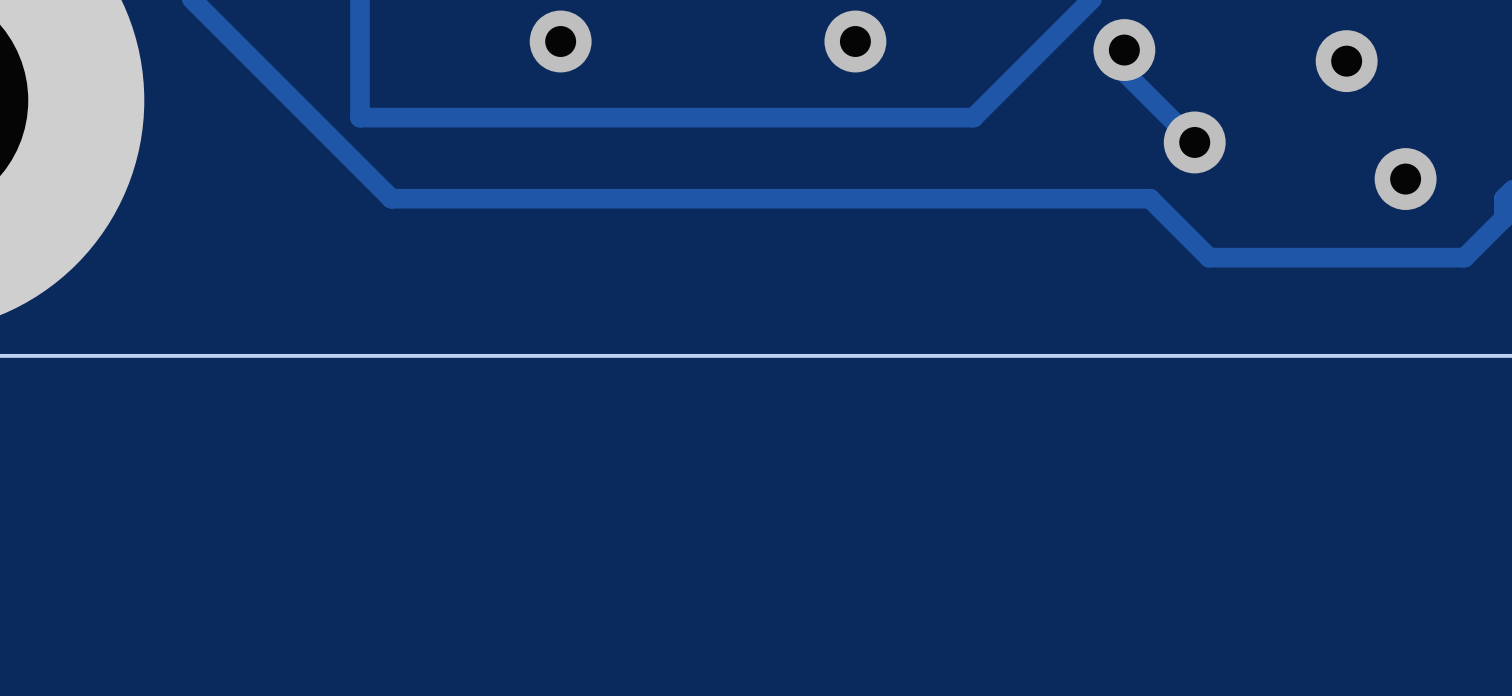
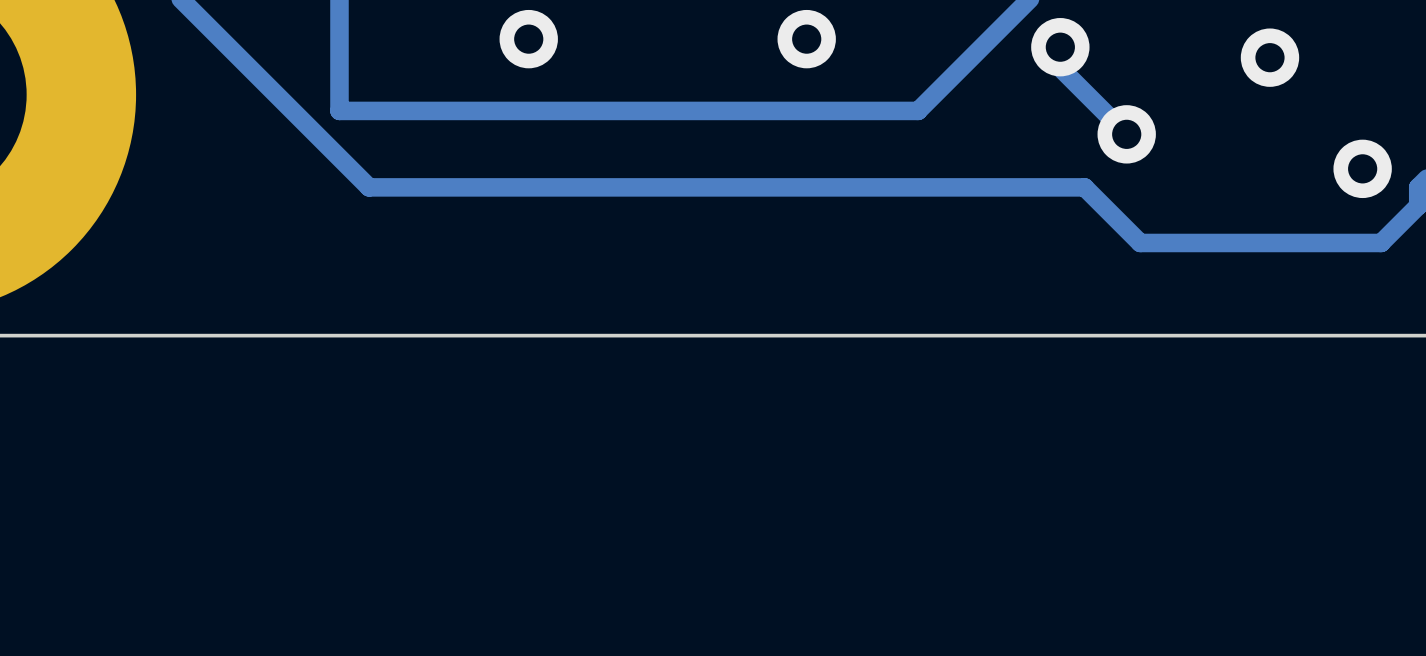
via position: (1405, 179) -> (1362, 168)

